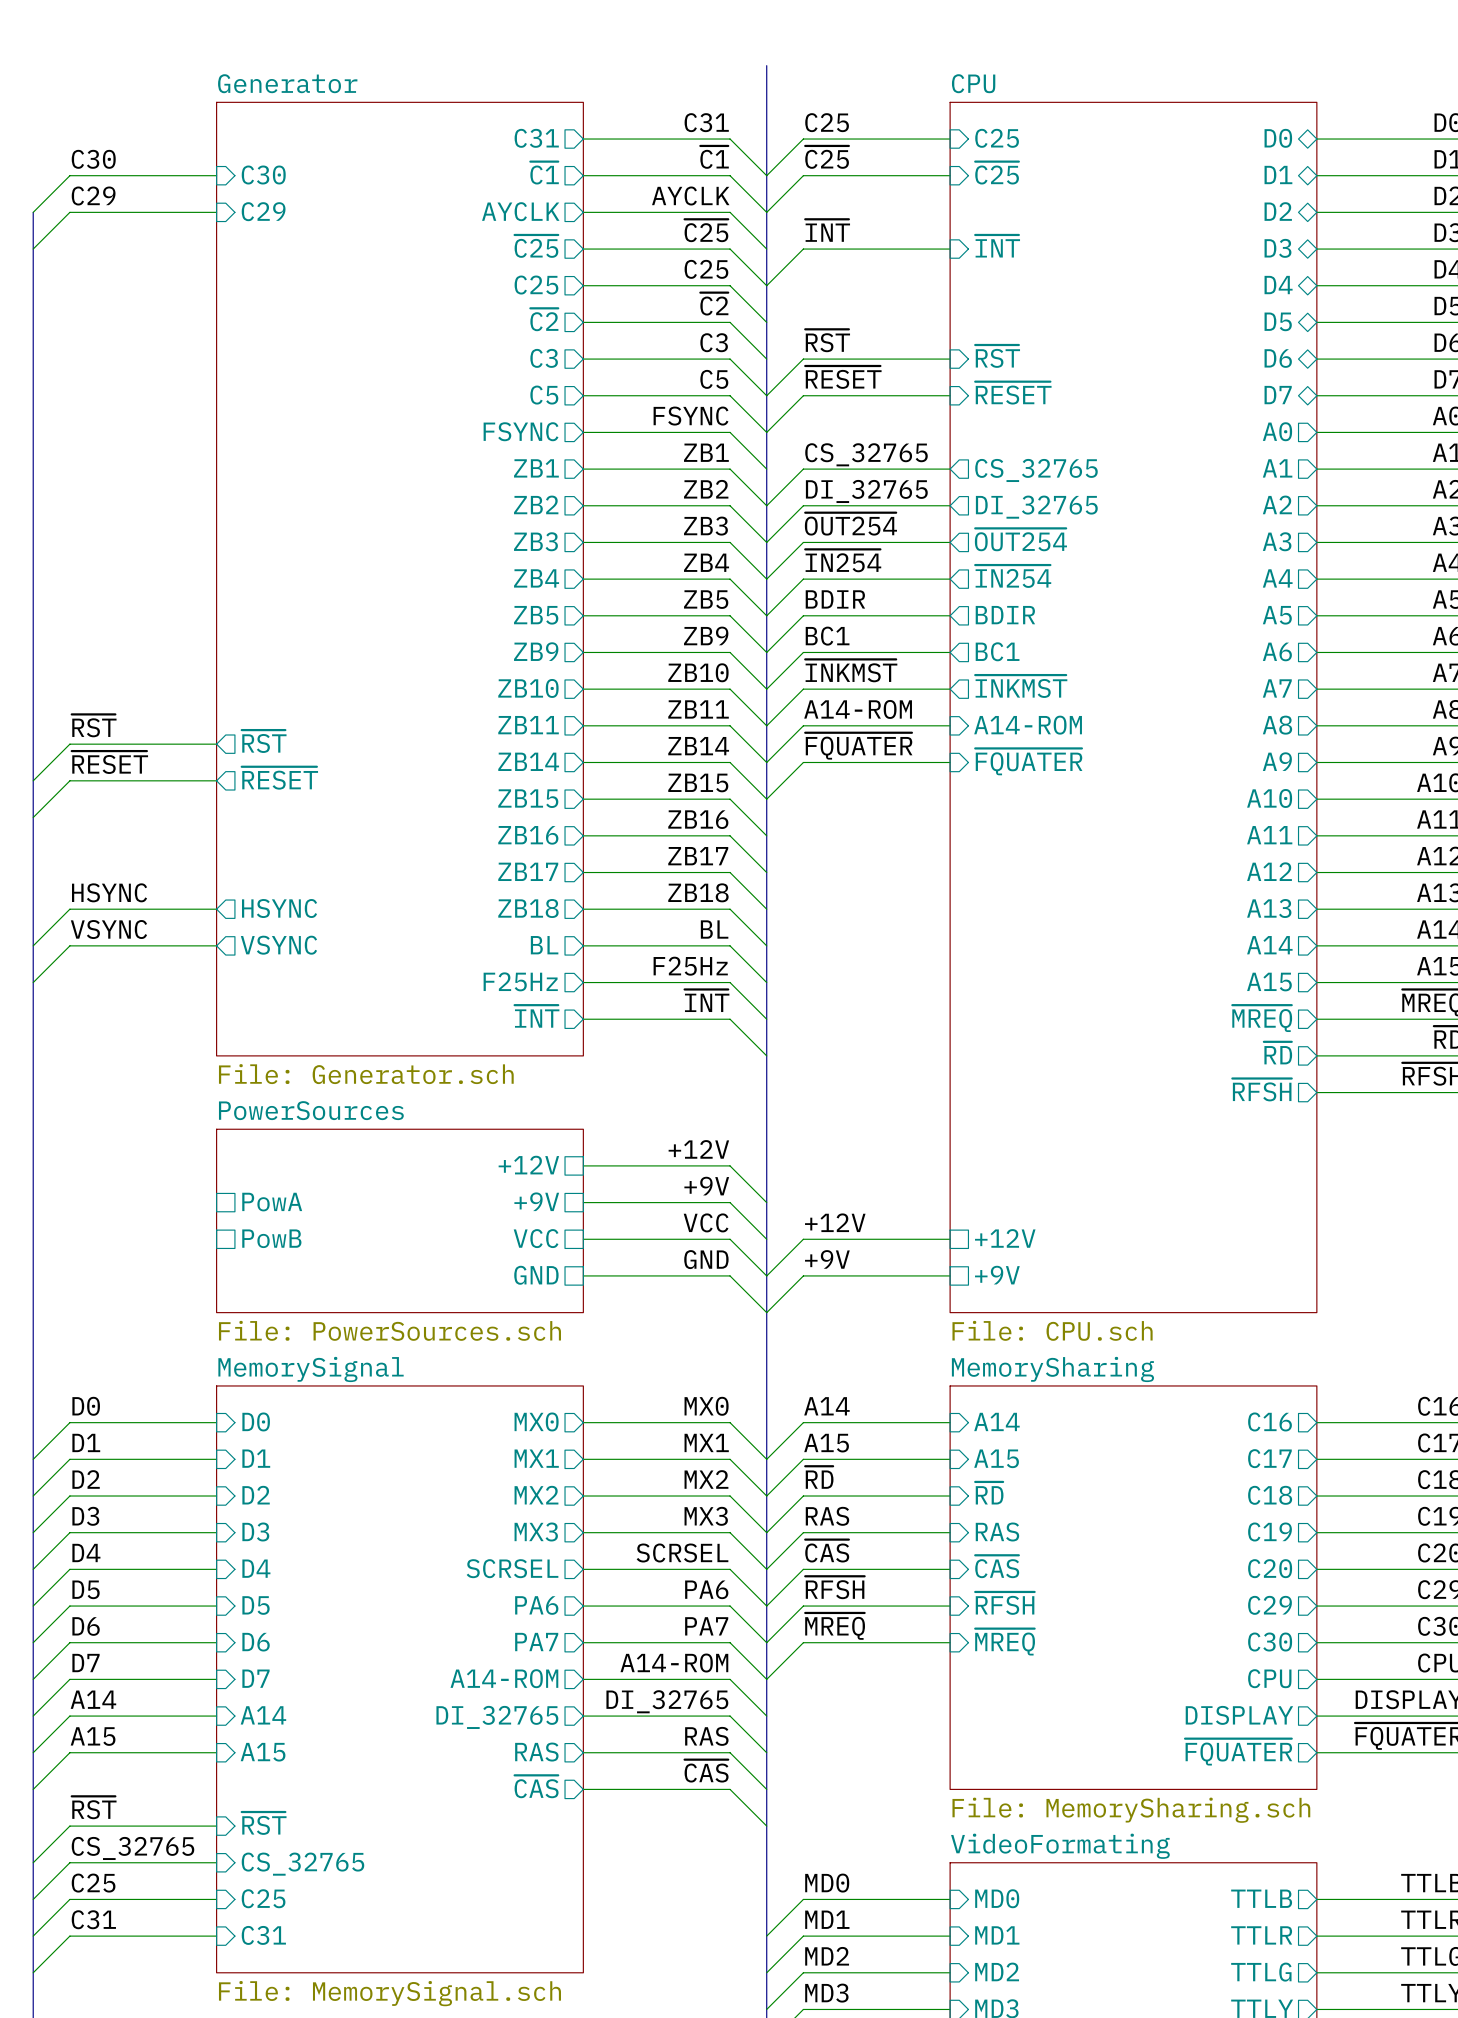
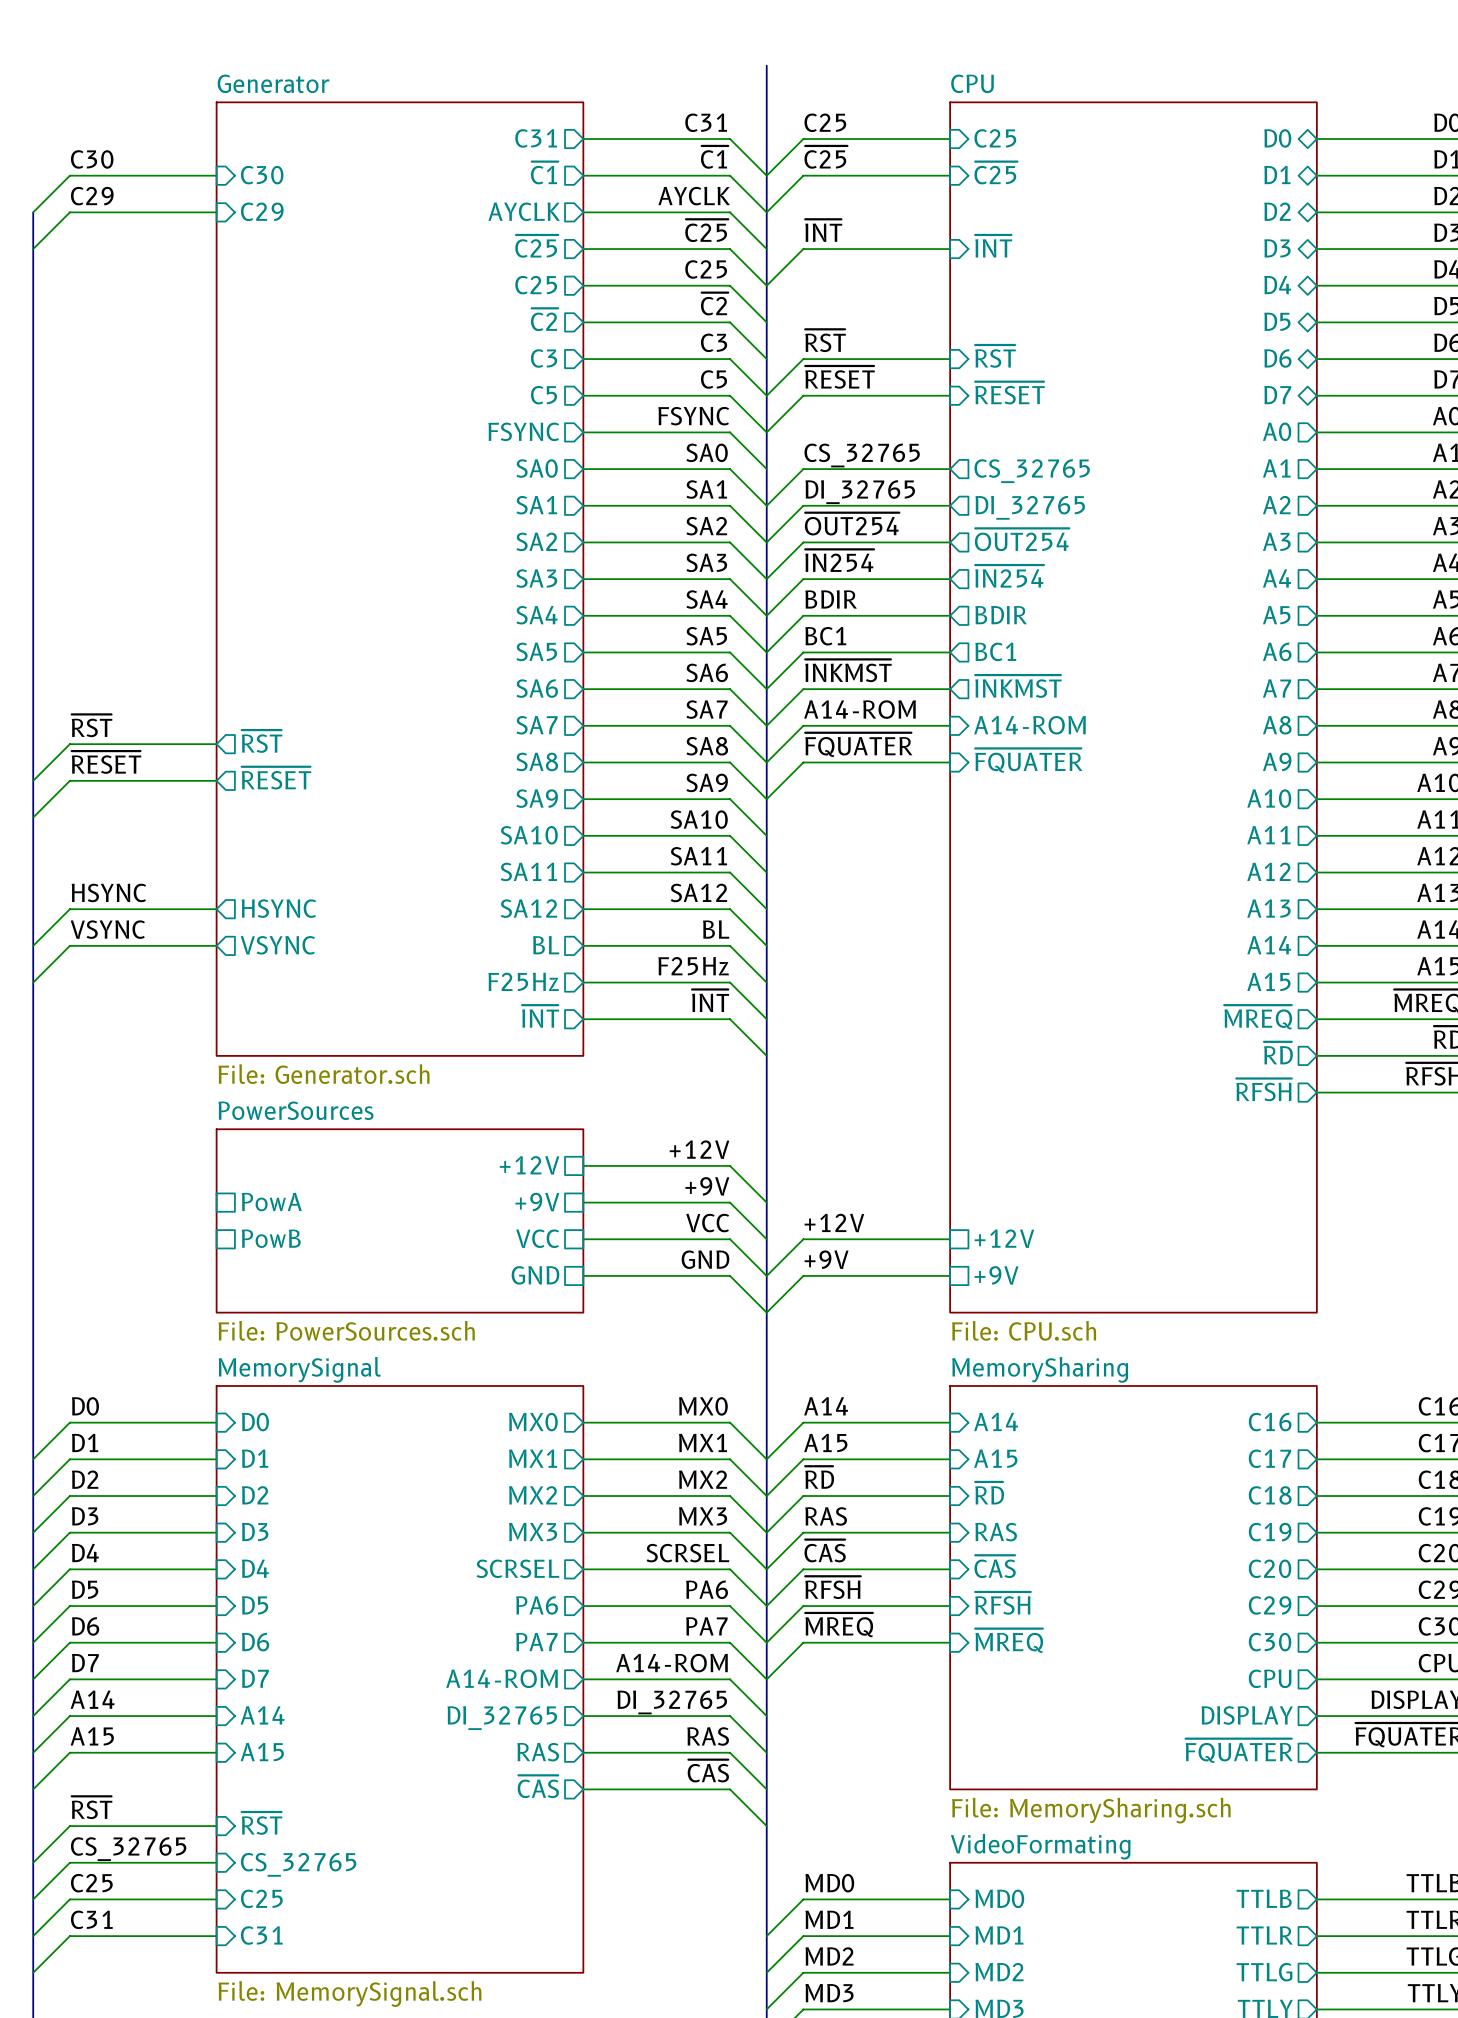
label: ZB1 (706, 452) -> SA0 (707, 452)
sheet pin: ZB1 (536, 468) -> SA0 (537, 468)
label: ZB2 (706, 489) -> SA1 (706, 489)
sheet pin: ZB2 (536, 504) -> SA1 (536, 505)
label: ZB3 (705, 526) -> SA2 (706, 526)
sheet pin: ZB3 (535, 541) -> SA2 (536, 541)
label: ZB4 (706, 562) -> SA3 (706, 562)
sheet pin: ZB4 (536, 578) -> SA3 (536, 578)
label: ZB5 (706, 599) -> SA4 (707, 599)
sheet pin: ZB5 (536, 615) -> SA4 (537, 615)
label: ZB9 (706, 635) -> SA5 (706, 636)
sheet pin: ZB9 (536, 651) -> SA5 (536, 651)
label: ZB10 (698, 672) -> SA6 (707, 672)
sheet pin: ZB10 (528, 688) -> SA6 (537, 688)
label: ZB11 (698, 709) -> SA7 (707, 709)
sheet pin: ZB11 (528, 725) -> SA7 (537, 725)
label: ZB14 (698, 746) -> SA8 (707, 746)
sheet pin: ZB14 (528, 761) -> SA8 (537, 761)
label: ZB15 (698, 782) -> SA9 (707, 782)
sheet pin: ZB15 (528, 798) -> SA9 (537, 798)
label: ZB16 (698, 819) -> SA10 (699, 819)
sheet pin: ZB16 (528, 835) -> SA10 (529, 835)
label: ZB17 (698, 856) -> SA11 (698, 856)
sheet pin: ZB17 (528, 871) -> SA11 (528, 871)
label: ZB18 (698, 892) -> SA12 (698, 892)
sheet pin: ZB18 (528, 908) -> SA12 (528, 908)

